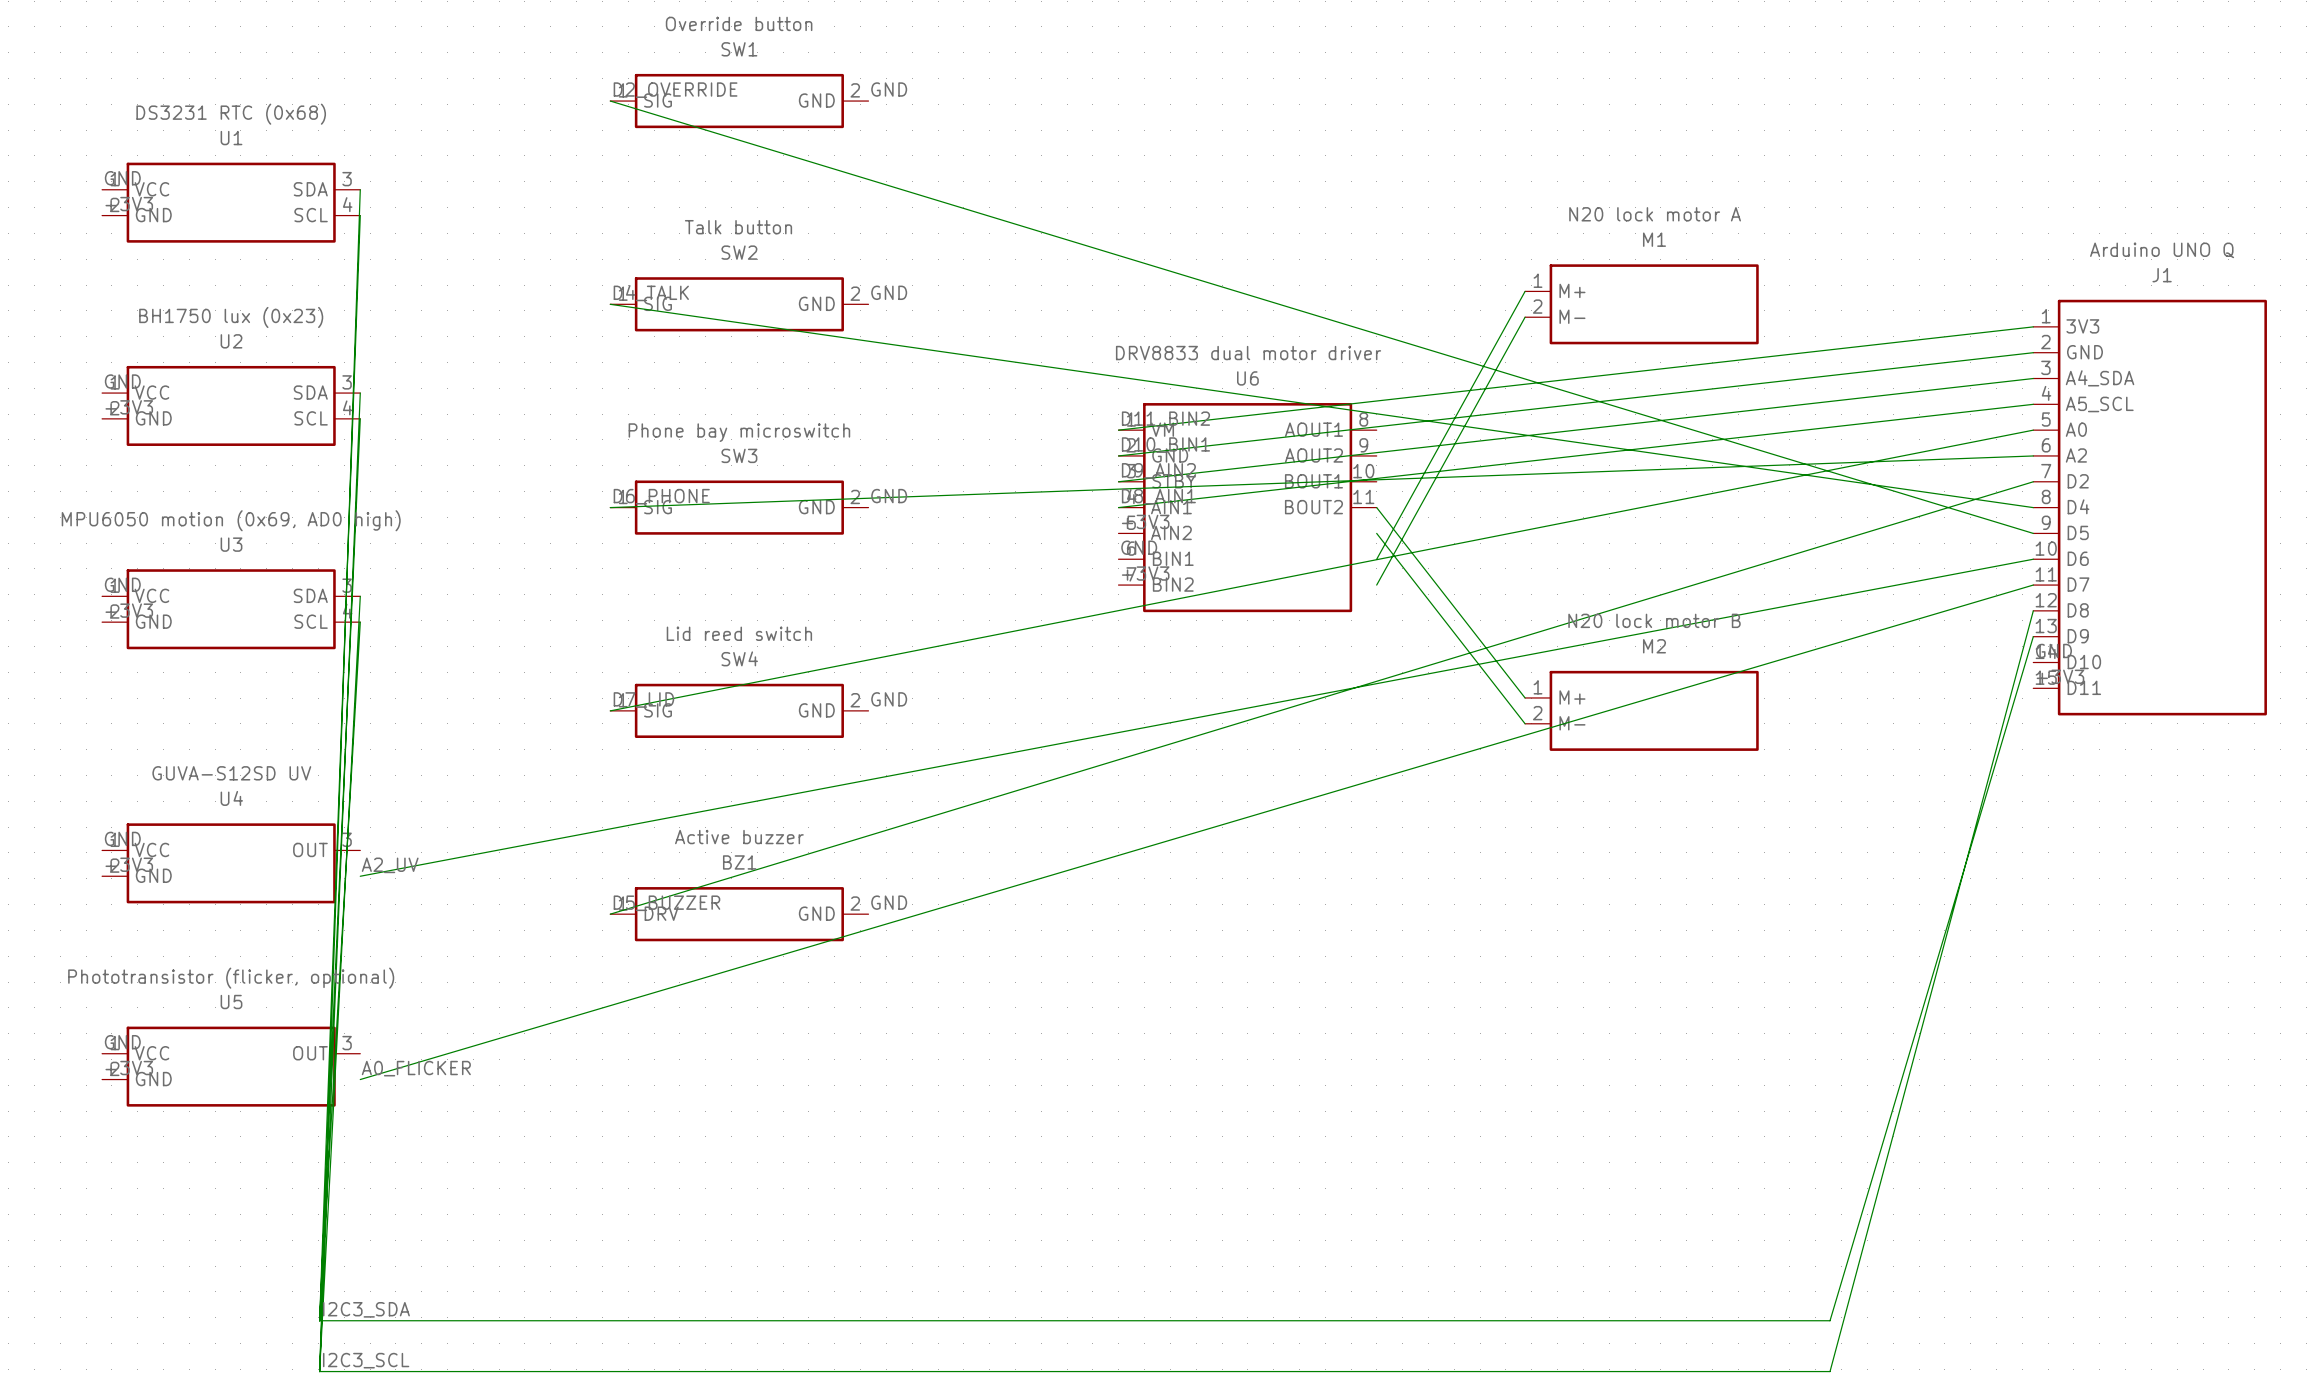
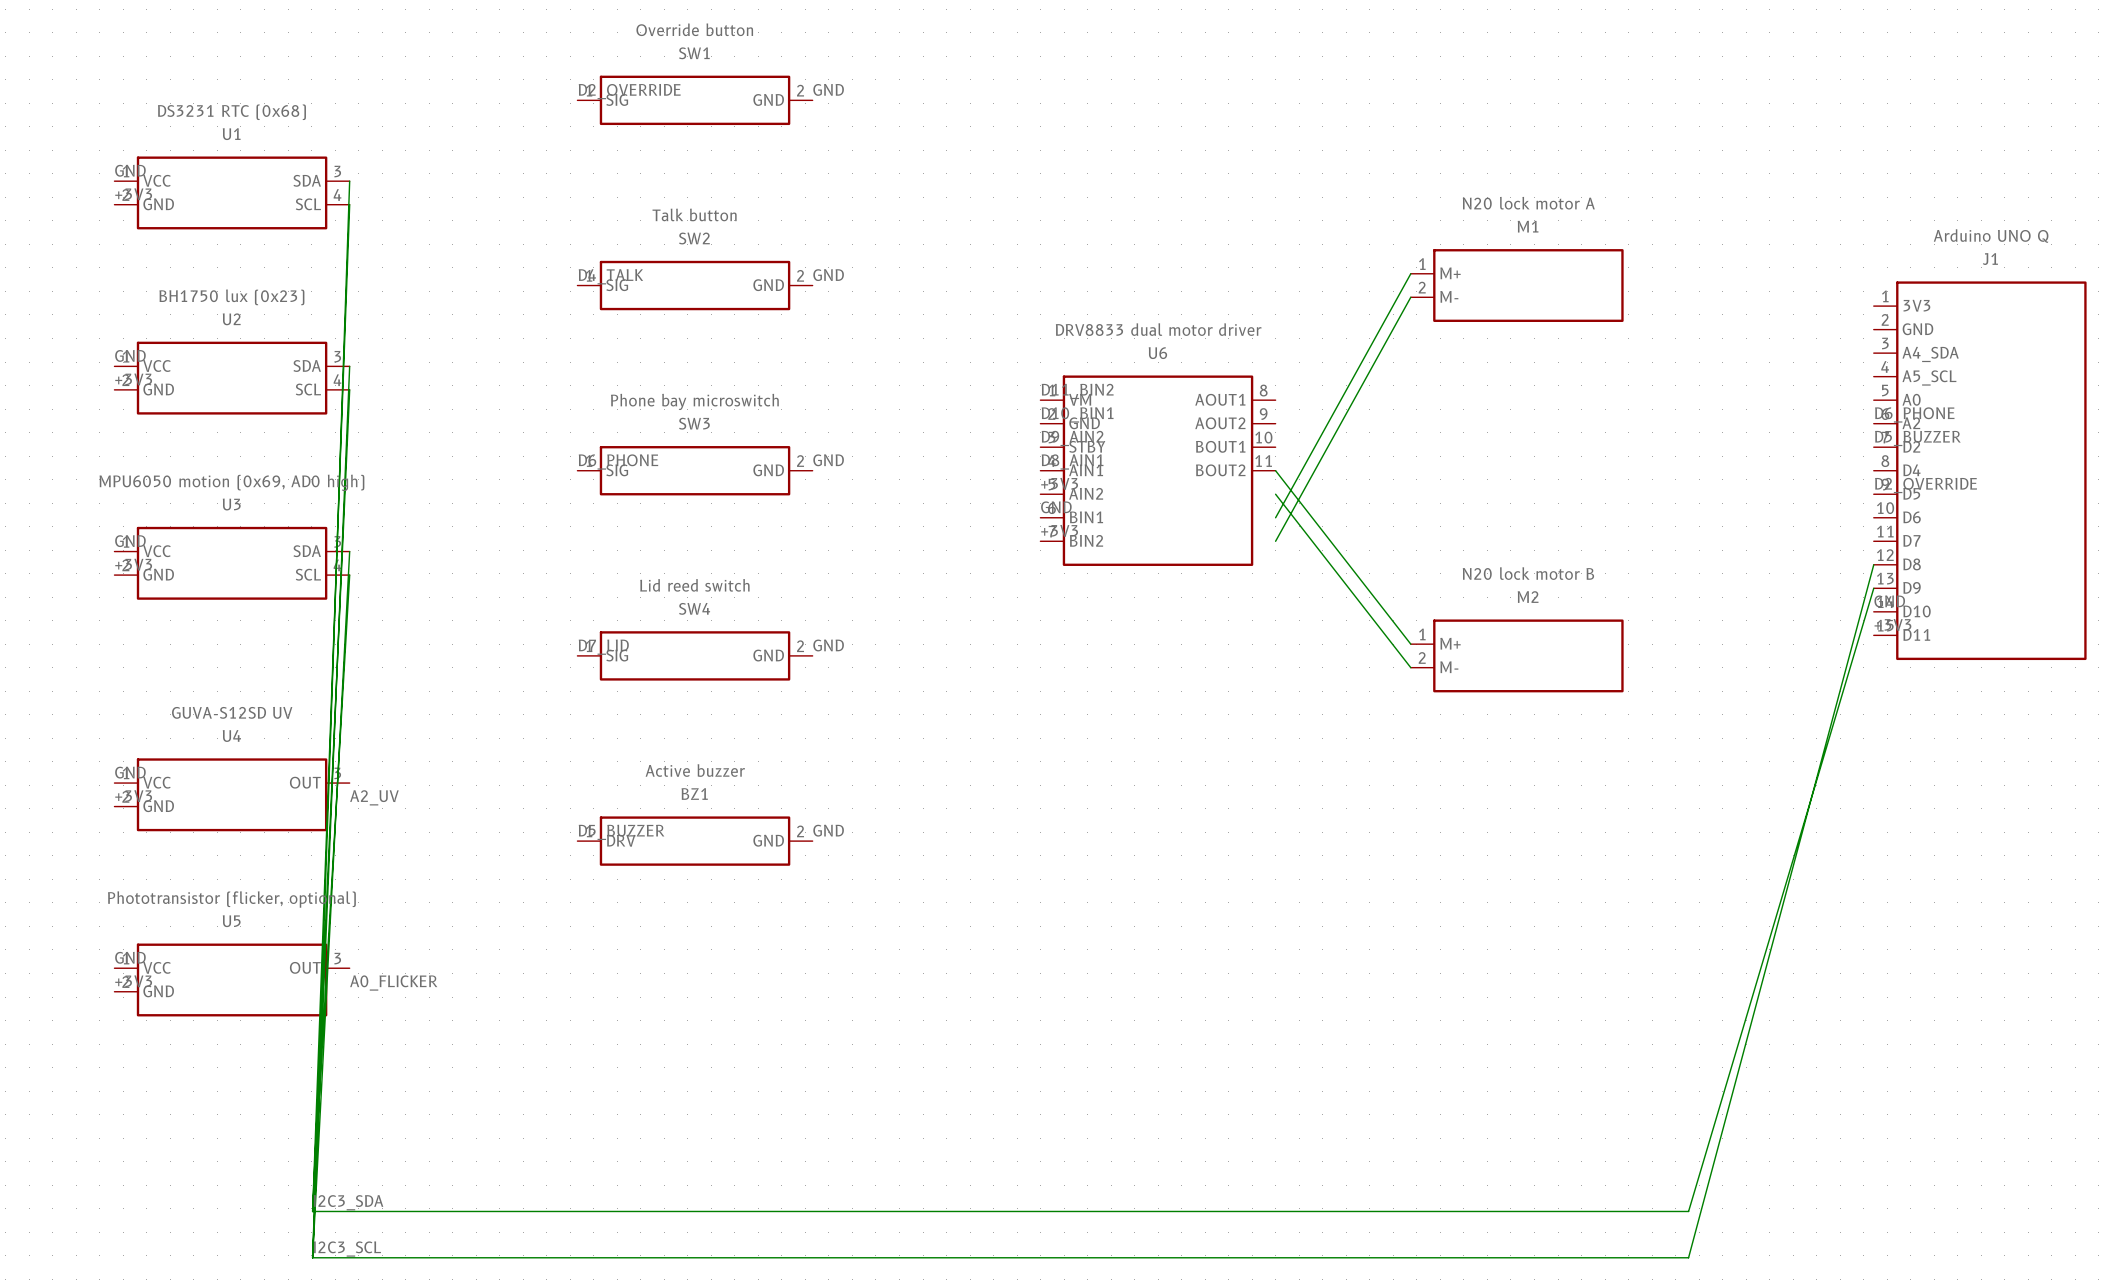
wire: (610, 101) (2033, 533) -> none
wire: (610, 304) (2033, 507) -> none
wire: (2033, 326) (1118, 430) -> none
wire: (2033, 352) (1118, 455) -> none
wire: (2033, 378) (1118, 481) -> none
wire: (2033, 404) (1118, 507) -> none
wire: (2033, 430) (610, 710) -> none
label: none -> D6_PHONE (1914, 414)
wire: (2033, 455) (610, 507) -> none
label: none -> D5_BUZZER (1917, 438)
wire: (2033, 481) (610, 914) -> none
label: none -> D2_OVERRIDE (1926, 485)
wire: (2033, 559) (360, 876) -> none
wire: (2033, 585) (360, 1079) -> none

